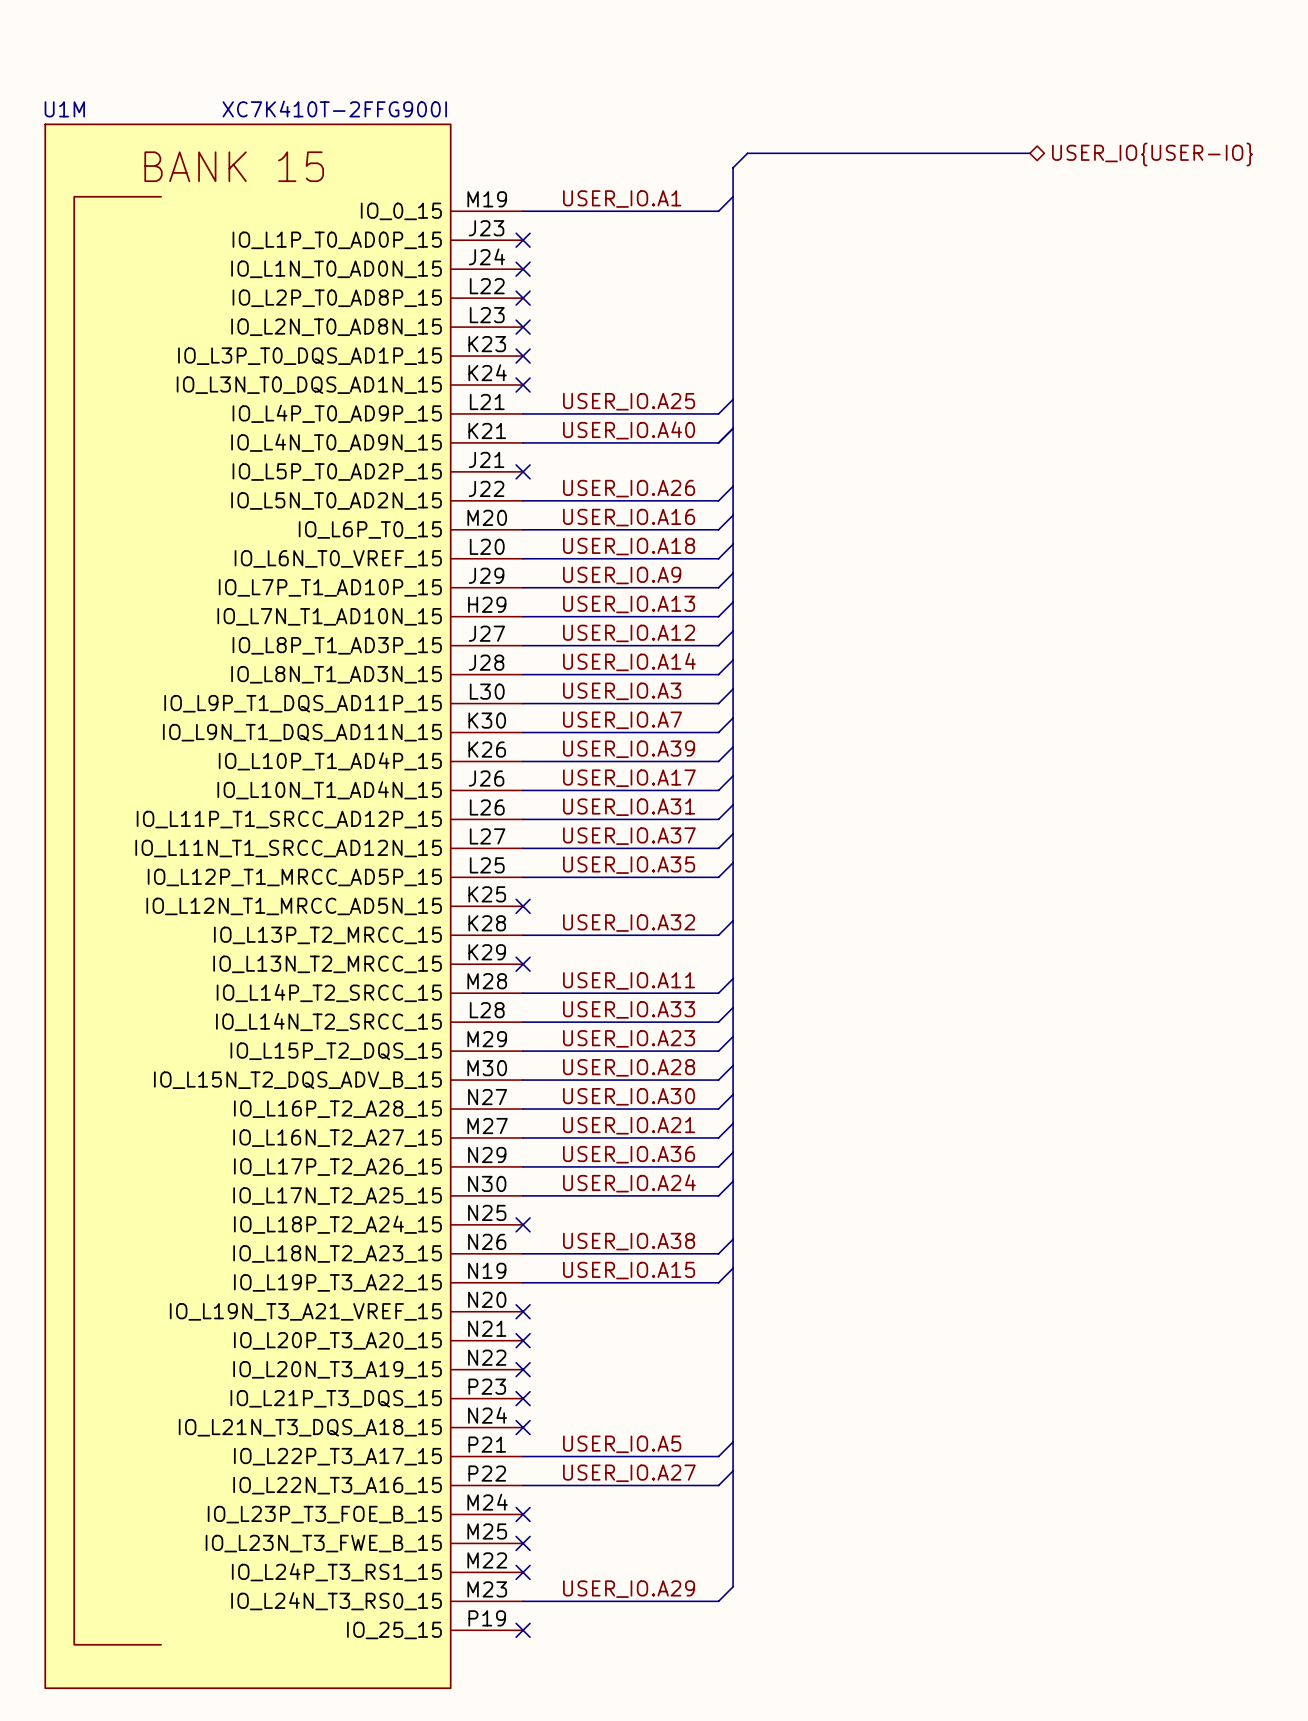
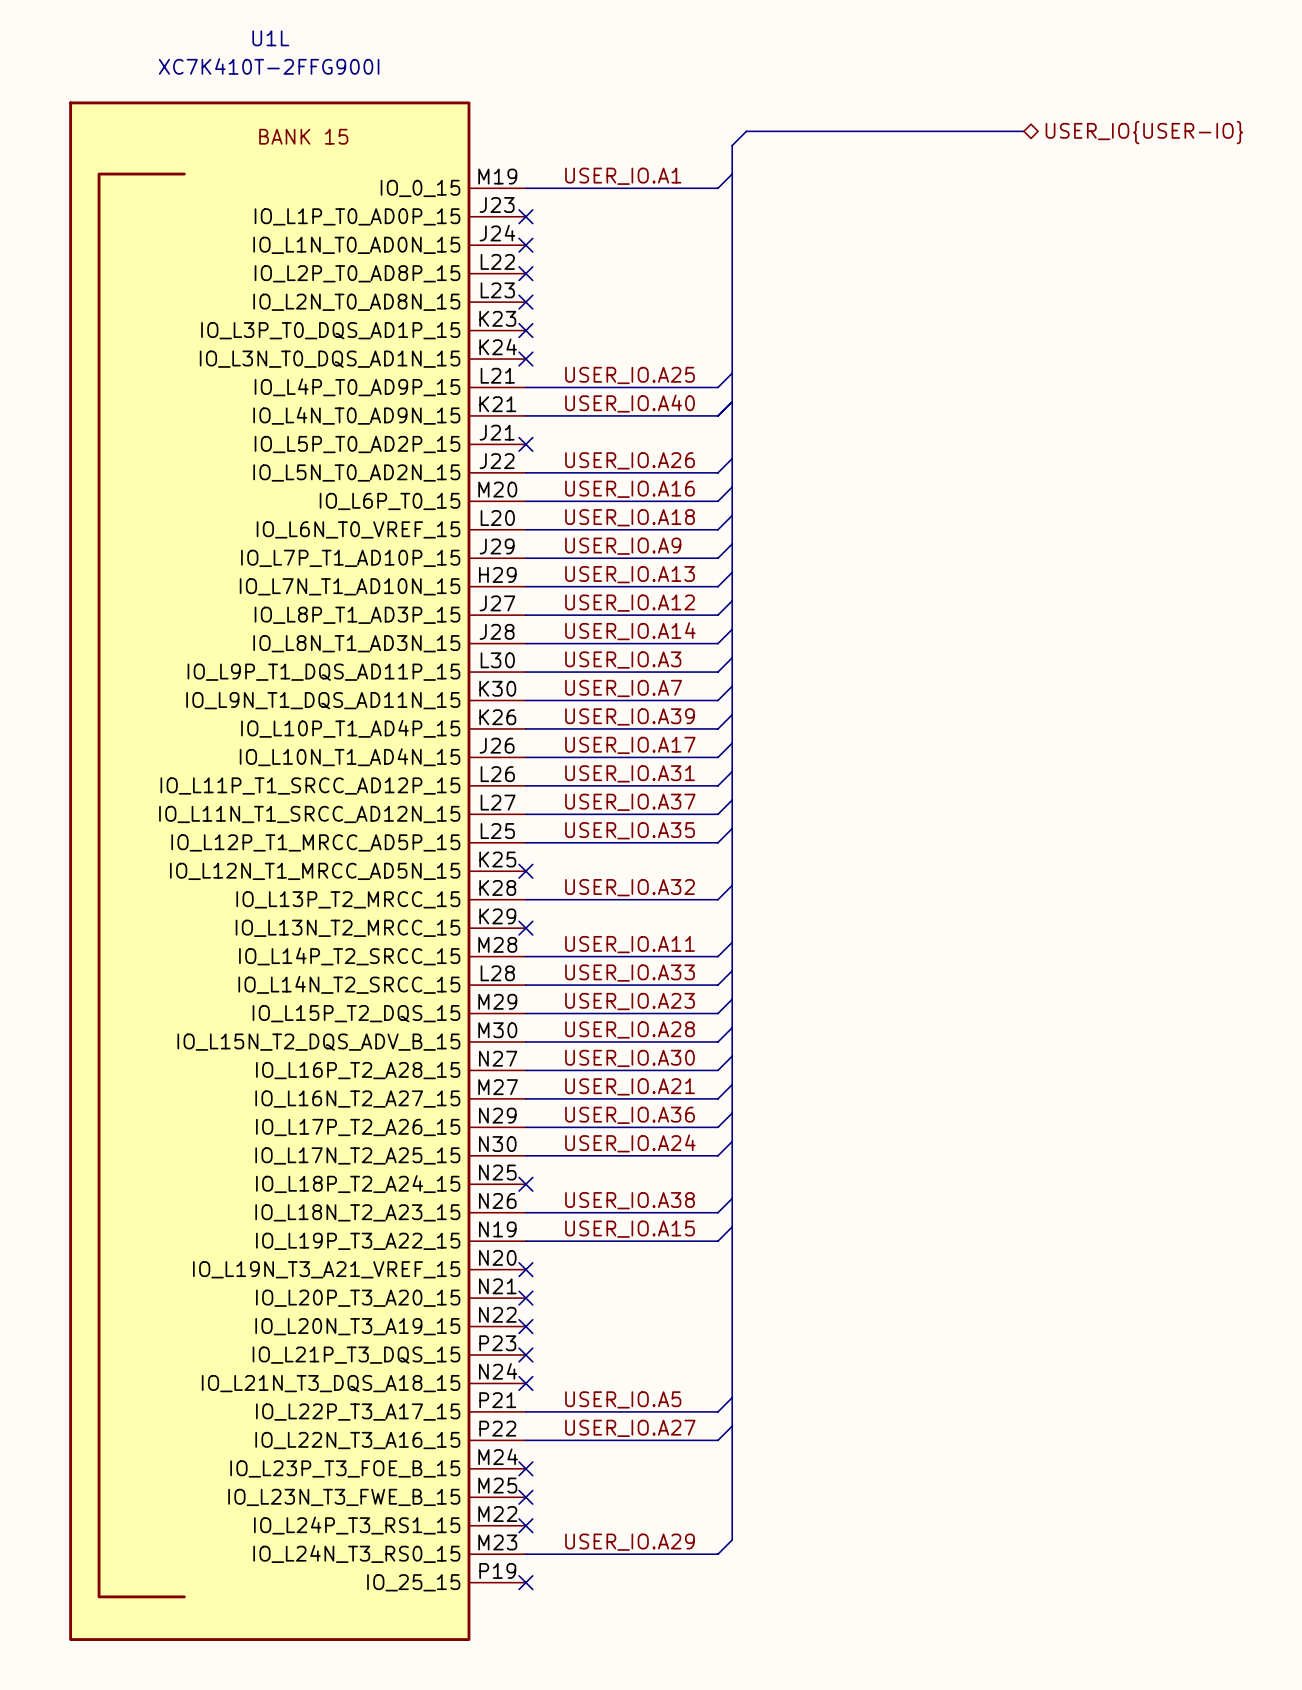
U1M: XC7K410T-2FFG900I (283, 906) -> none
U1L: none -> XC7K410T-2FFG900I (297, 871)

